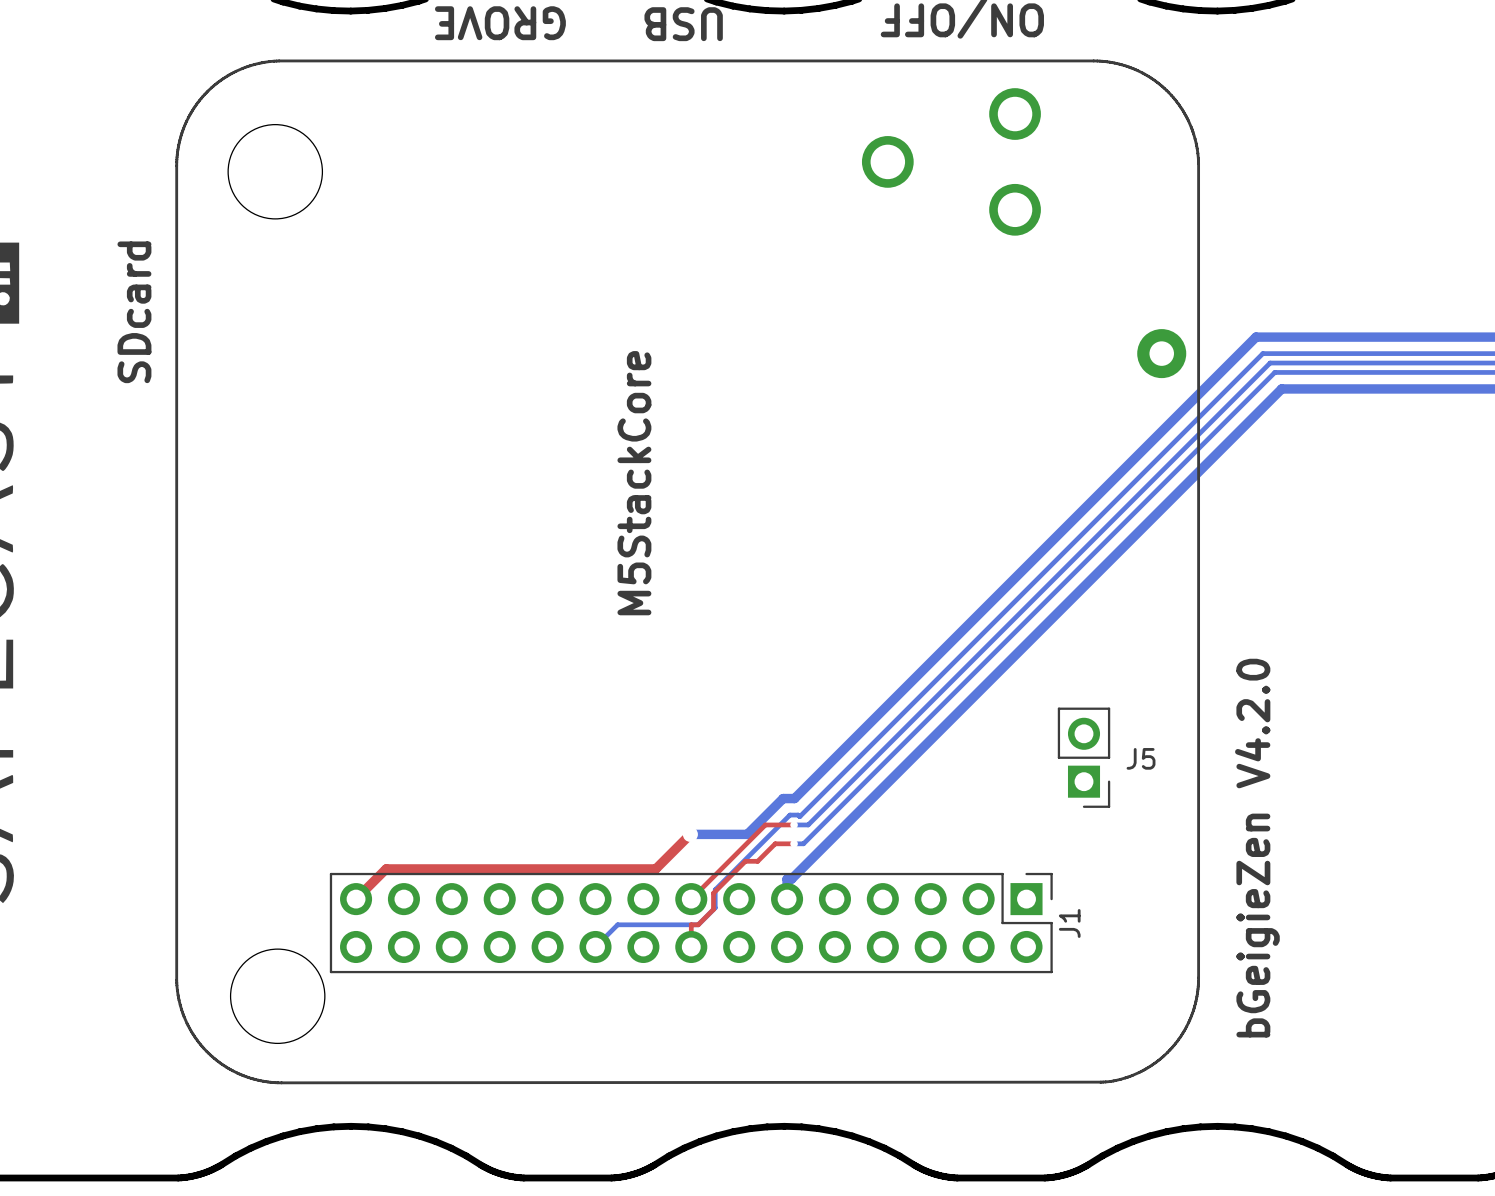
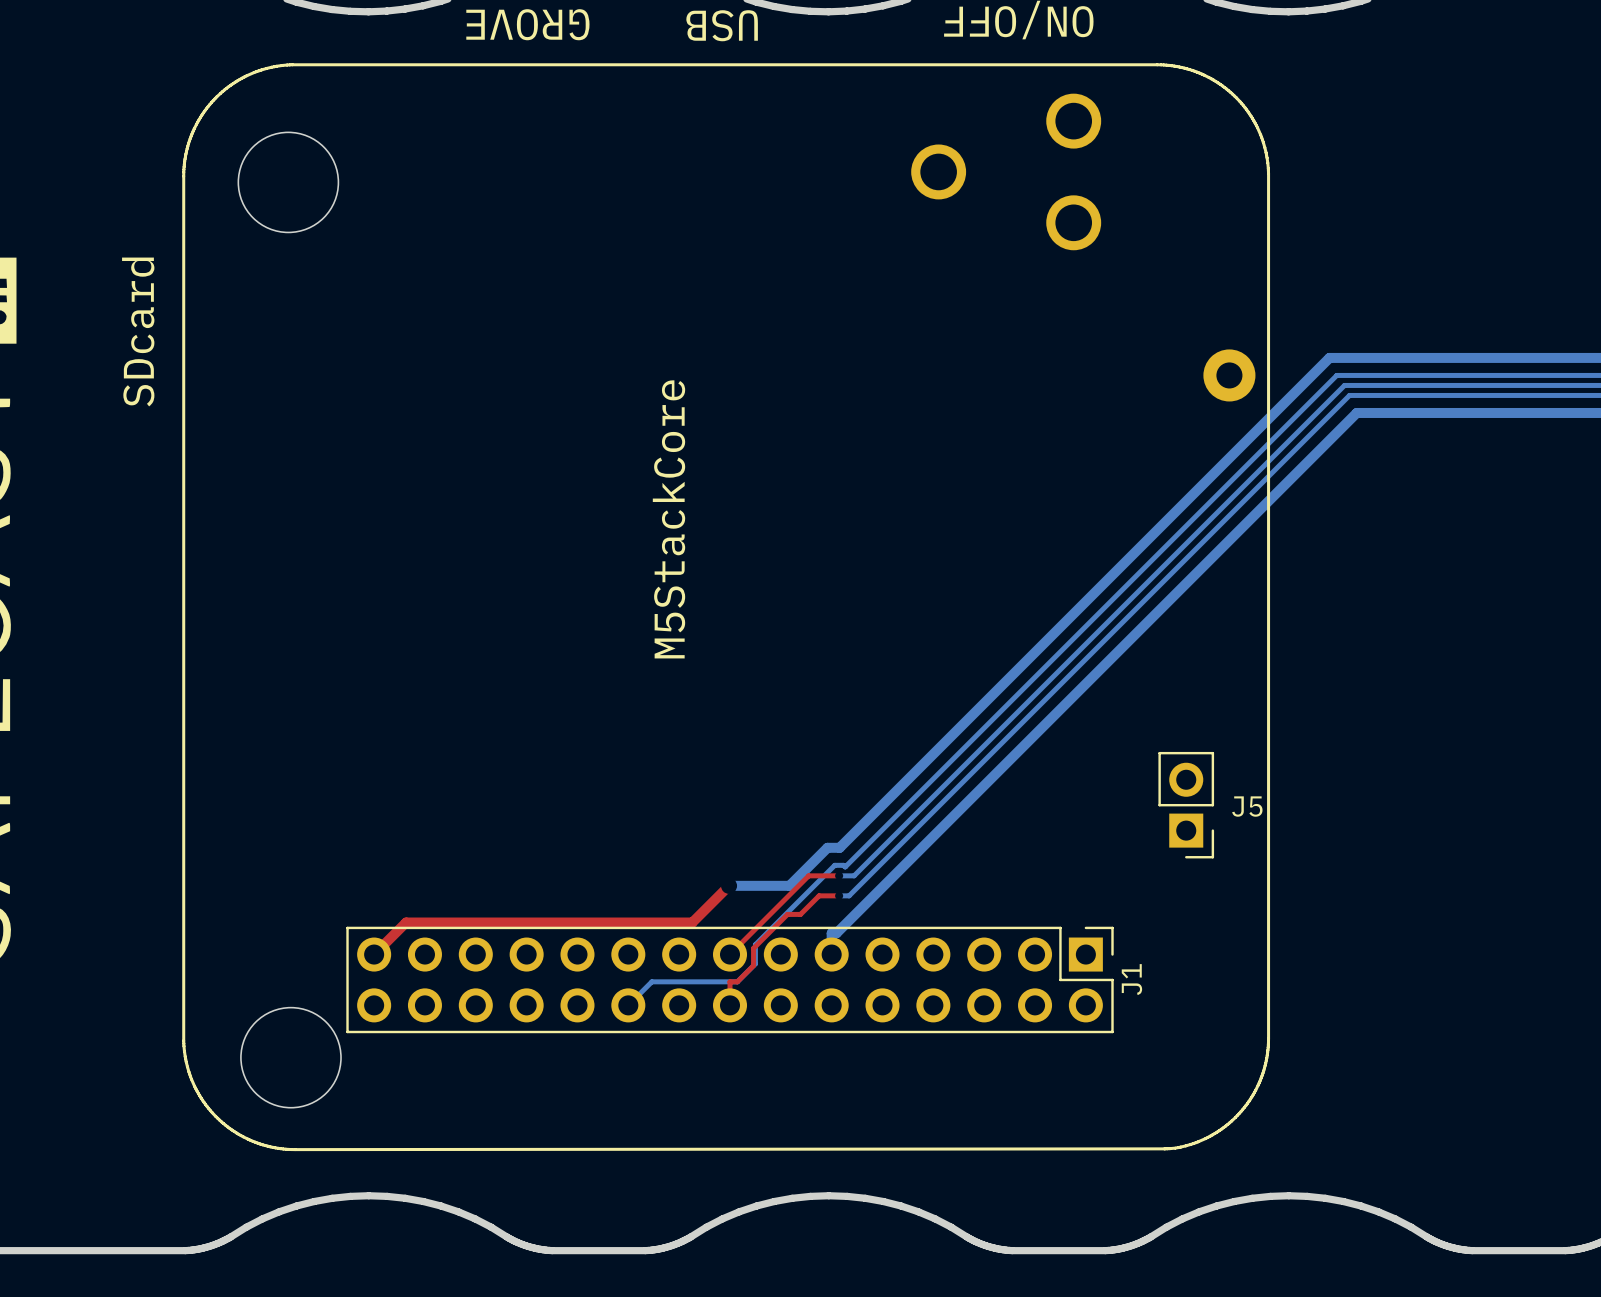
J5 position: (1084, 757) -> (1186, 805)
text: bGeigieZen V4.2.0 (1257, 848) -> none

